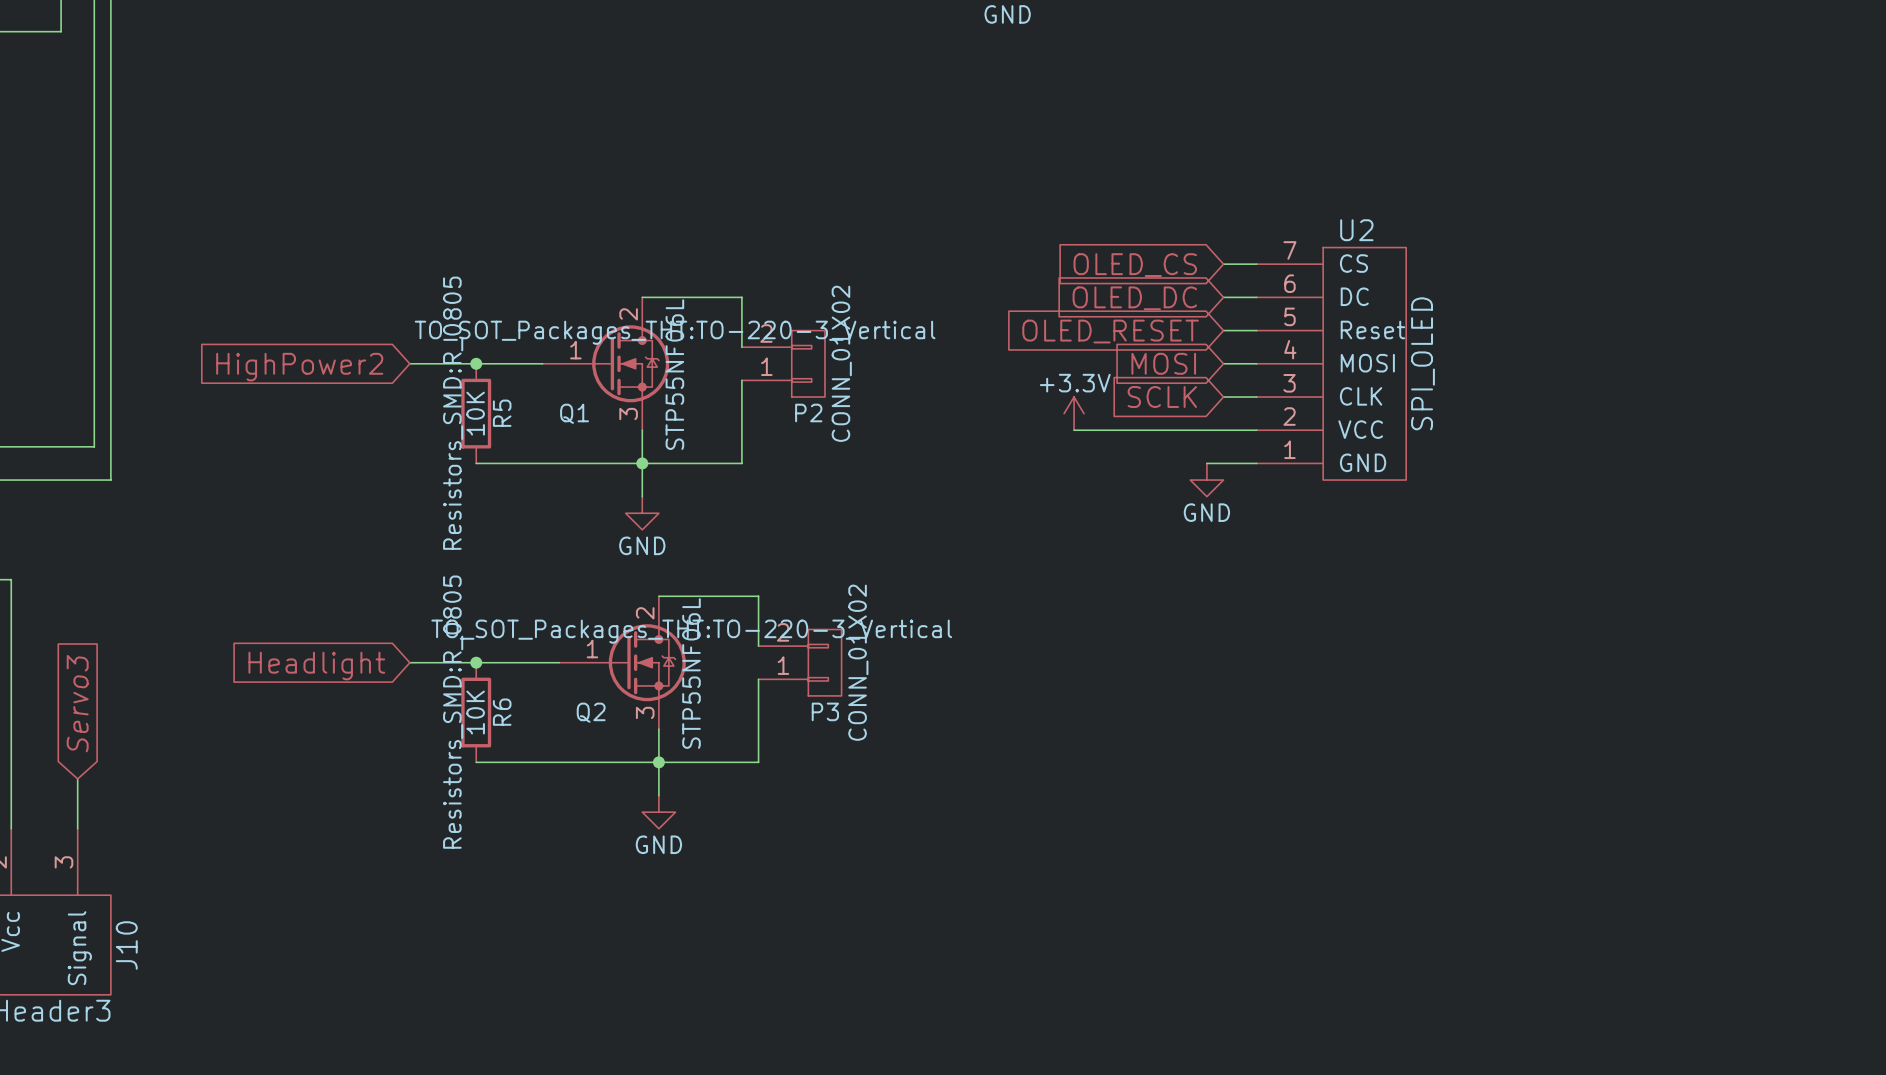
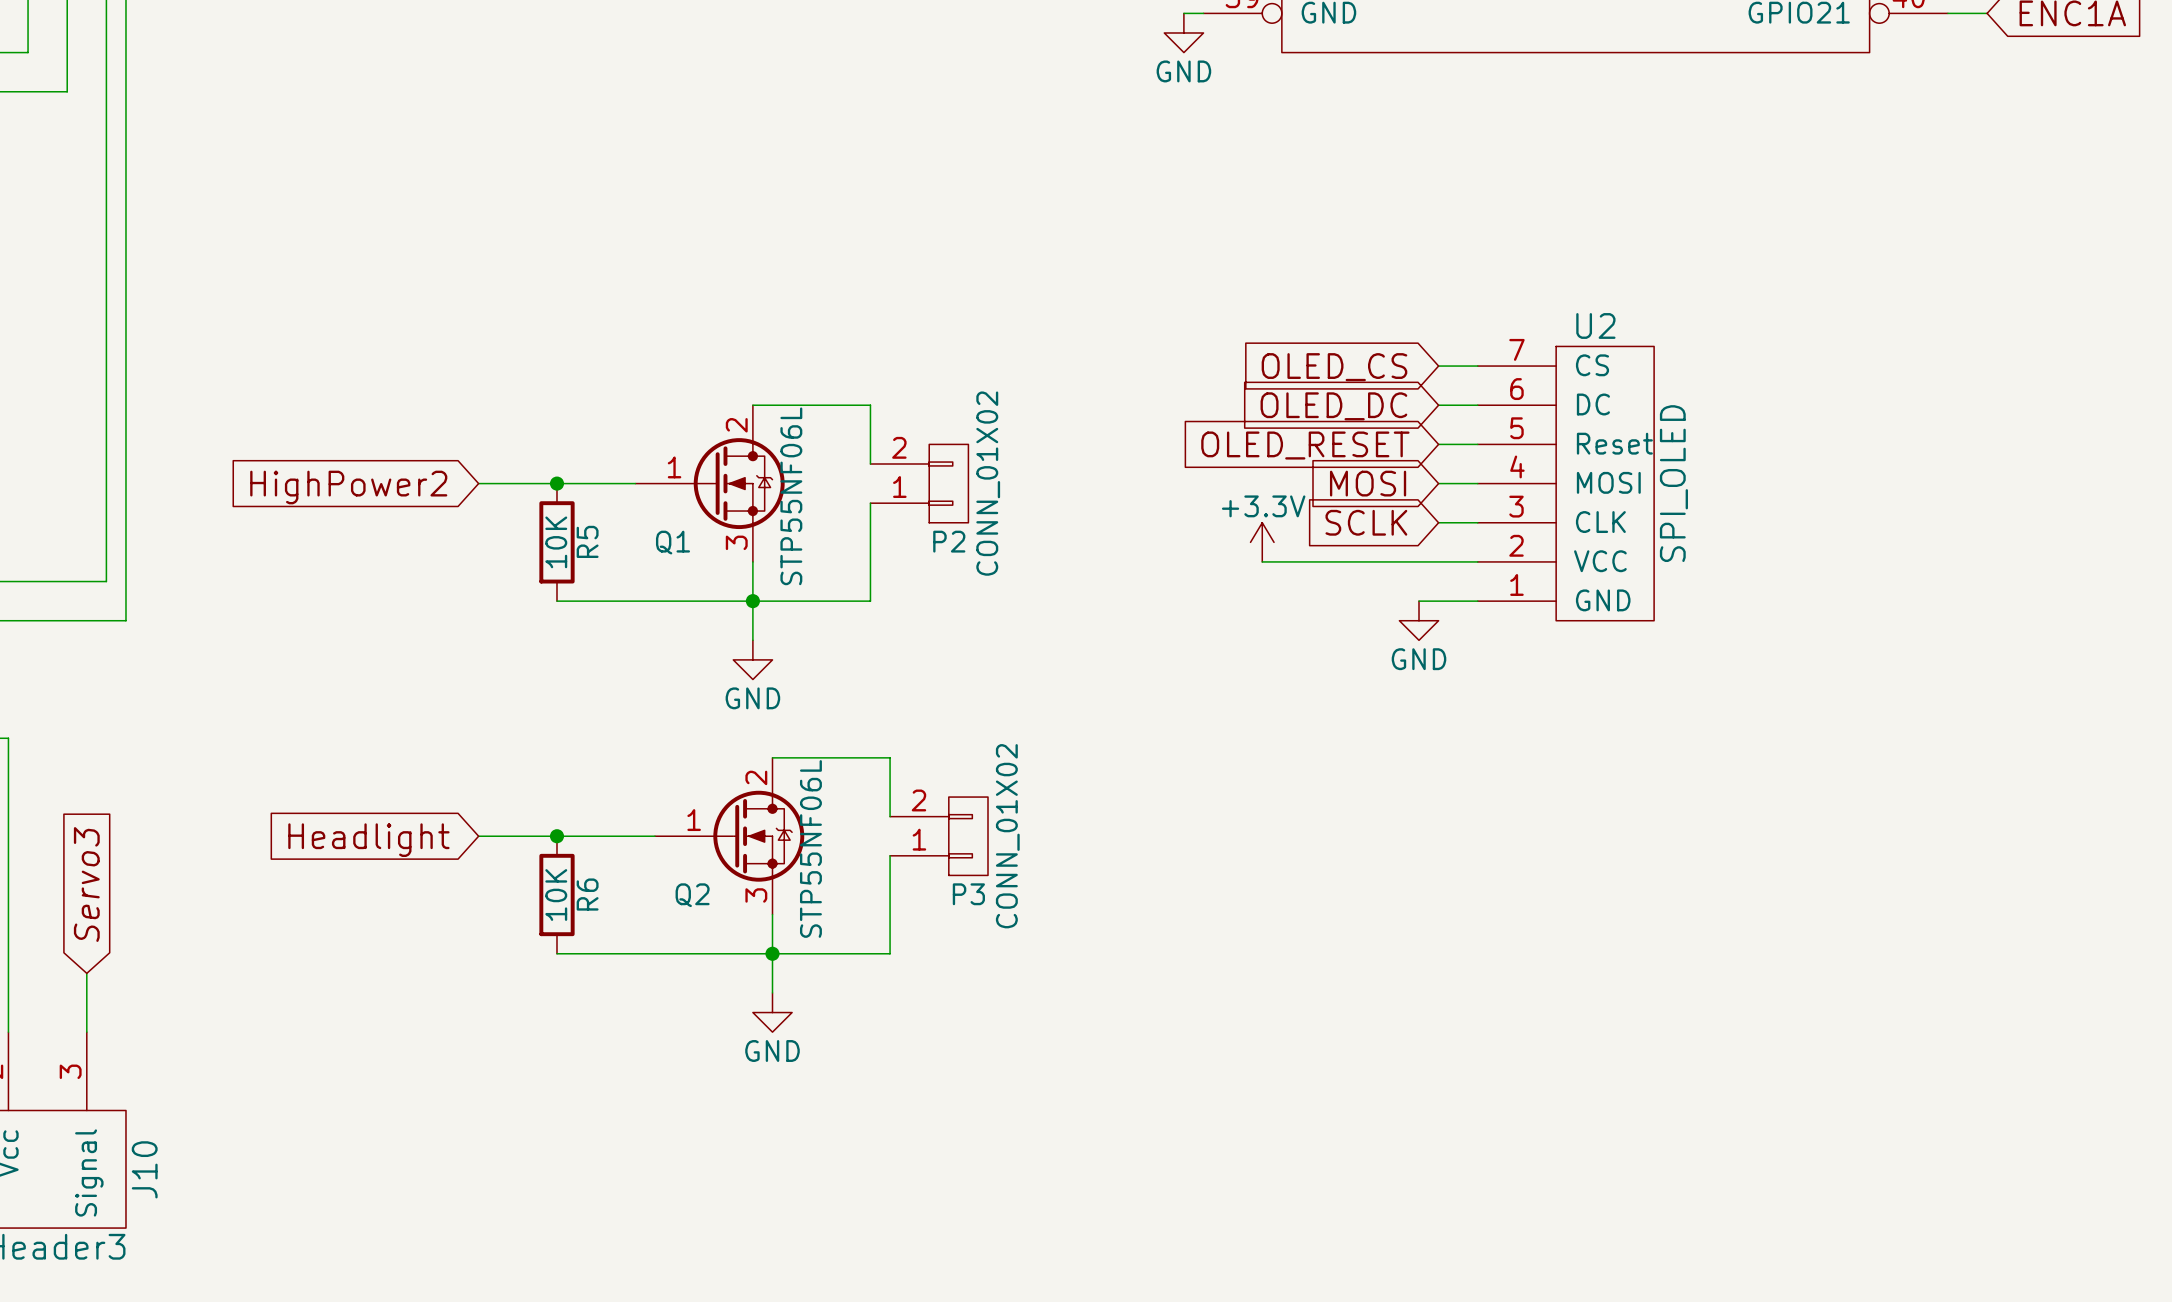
Q1 text: TO_SOT_Packages_THT:TO-220-3_Vertical (675, 332) -> none
R5 text: Resistors_SMD:R_0805 (453, 413) -> none
Q2 text: TO_SOT_Packages_THT:TO-220-3_Vertical (691, 631) -> none
R6 text: Resistors_SMD:R_0805 (453, 712) -> none

